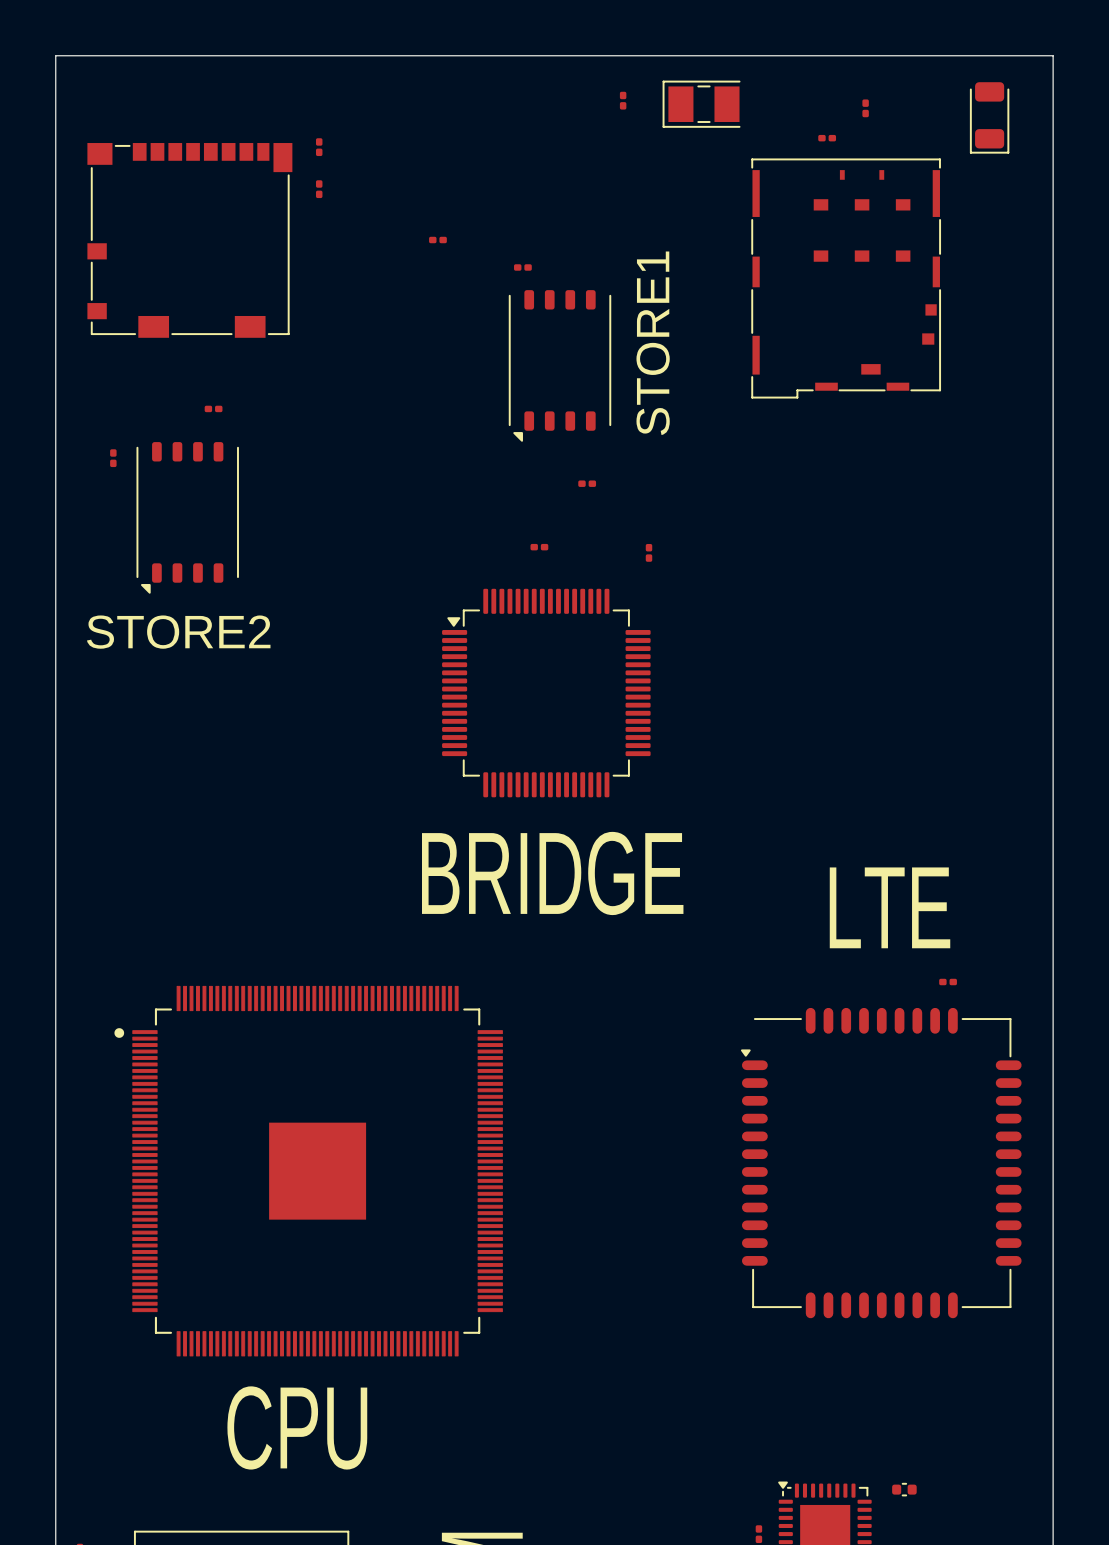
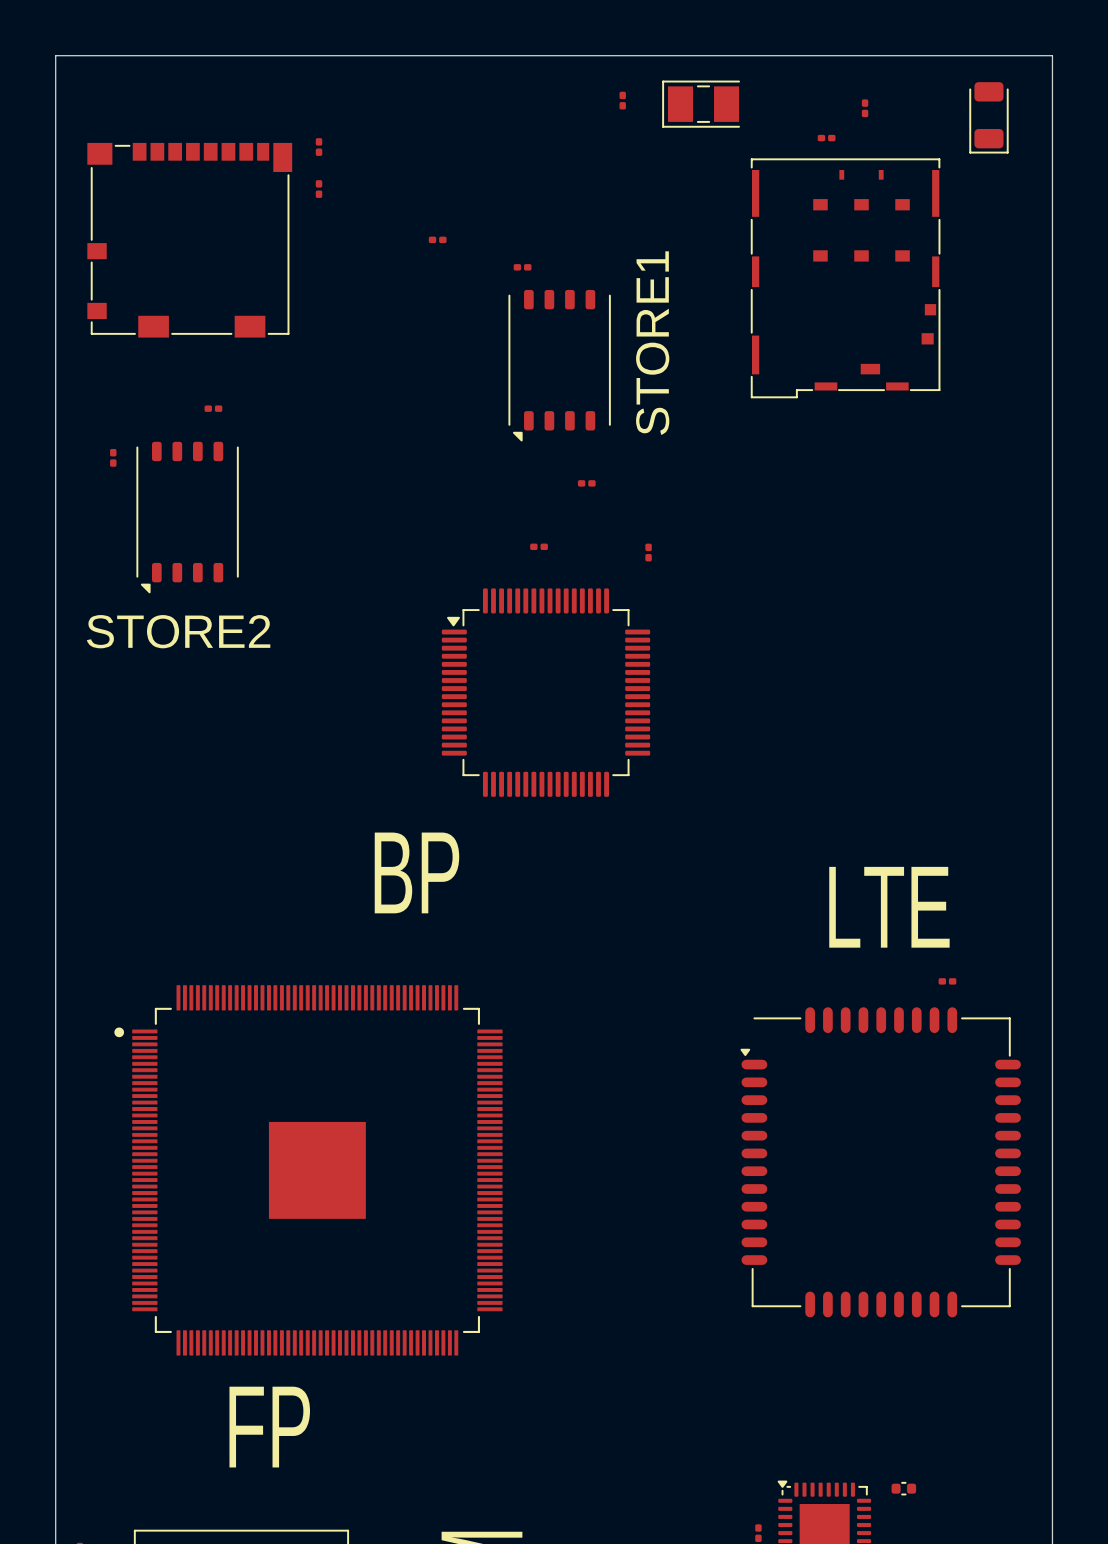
text: BRIDGE (552, 873) -> BP (416, 872)
text: CPU (297, 1427) -> FP (269, 1427)

